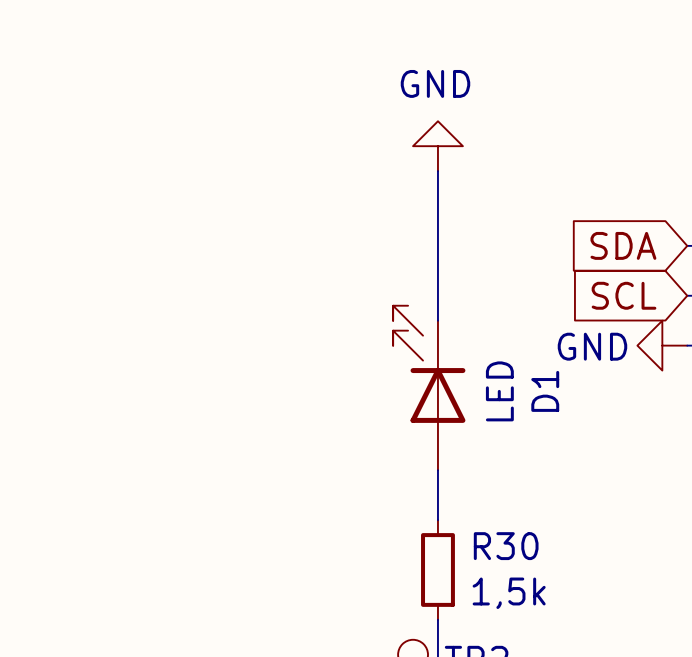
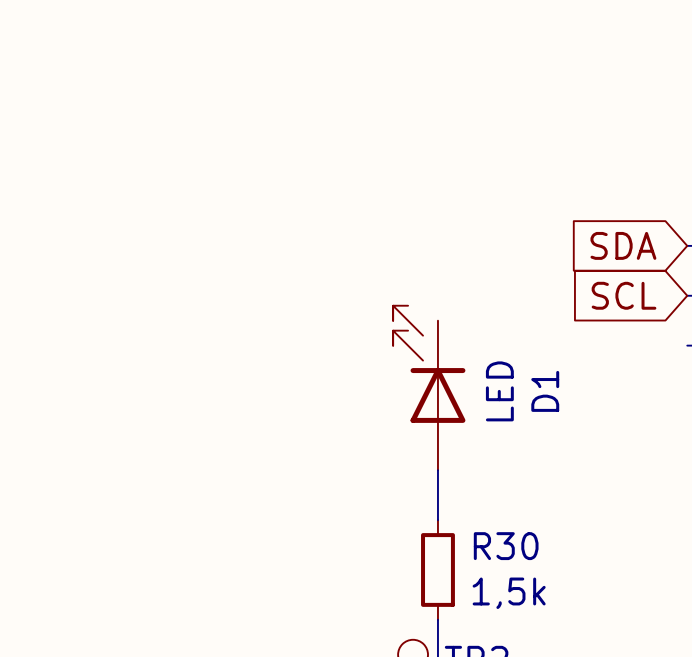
power symbol: GND (437, 146) -> none
wire: (437, 171) (437, 320) -> none
power symbol: GND (662, 345) -> none

